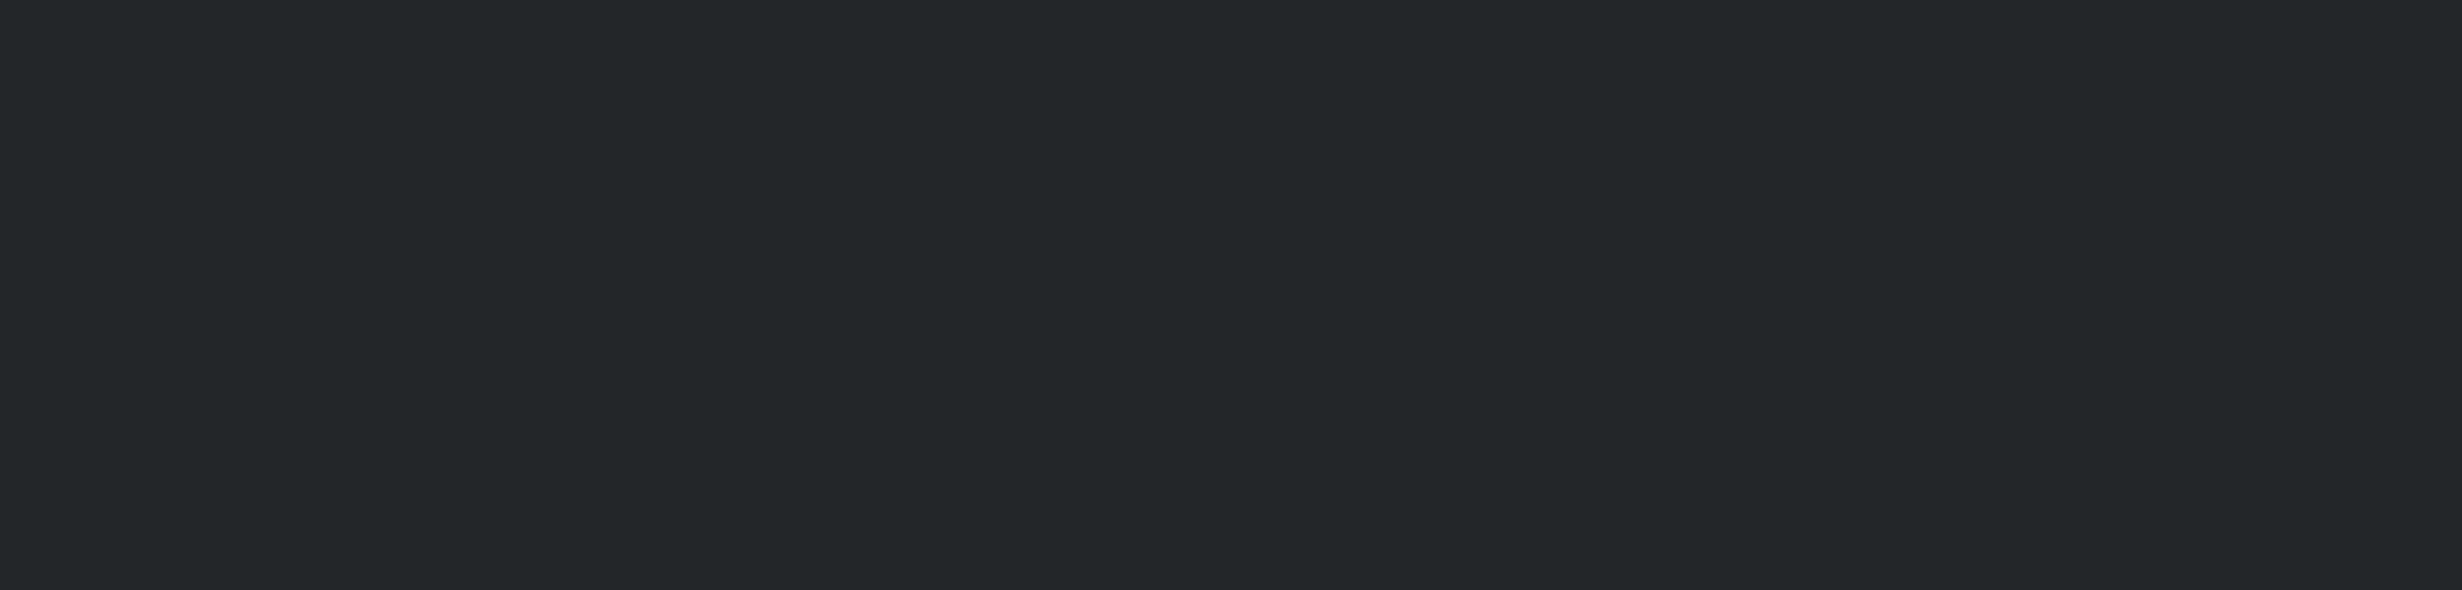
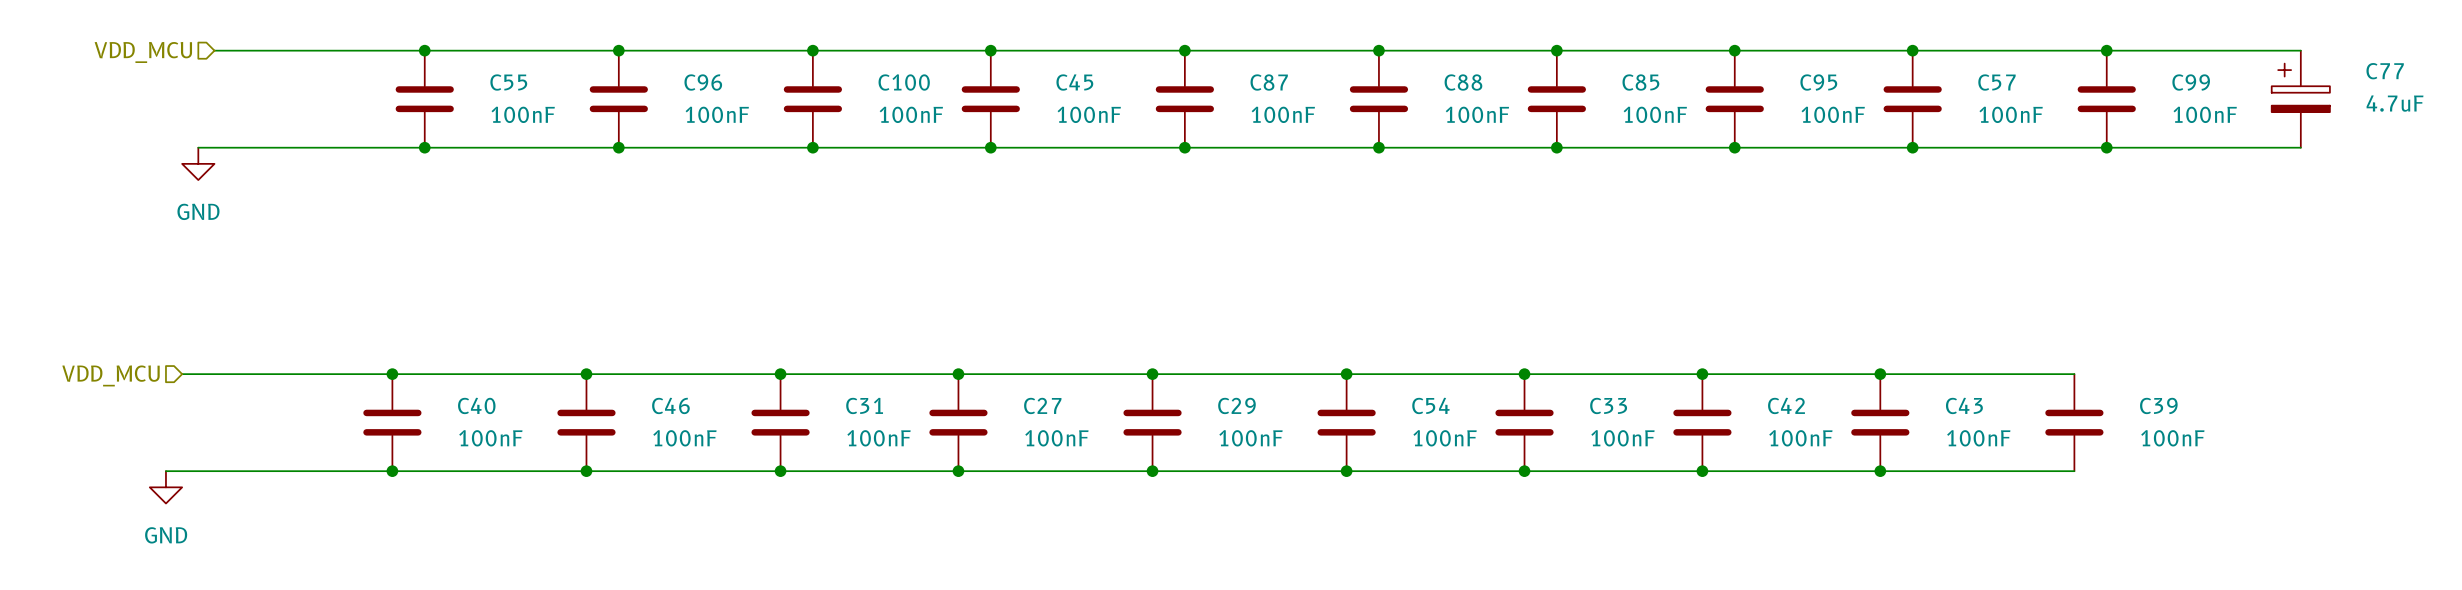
wire: none -> (214, 50) (2300, 50)
junction: none -> (424, 50)
junction: none -> (618, 50)
junction: none -> (812, 50)
junction: none -> (990, 50)
junction: none -> (1184, 50)
junction: none -> (1378, 50)
junction: none -> (1556, 50)
junction: none -> (1734, 50)
junction: none -> (1912, 50)
junction: none -> (2106, 50)
hierarchical label: none -> VDD_MCU (143, 52)
C55: none -> 100nF (424, 99)
C96: none -> 100nF (618, 99)
C100: none -> 100nF (812, 99)
C45: none -> 100nF (990, 99)
C87: none -> 100nF (1184, 99)
C88: none -> 100nF (1378, 99)
C85: none -> 100nF (1556, 99)
C95: none -> 100nF (1734, 99)
C57: none -> 100nF (1912, 99)
C99: none -> 100nF (2106, 99)
C77: none -> 4.7uF (2300, 99)
wire: none -> (198, 147) (2300, 147)
junction: none -> (424, 147)
junction: none -> (618, 147)
junction: none -> (812, 147)
junction: none -> (990, 147)
junction: none -> (1184, 147)
junction: none -> (1378, 147)
junction: none -> (1556, 147)
junction: none -> (1734, 147)
junction: none -> (1912, 147)
junction: none -> (2106, 147)
power symbol: none -> GND (198, 163)
wire: none -> (182, 374) (2074, 374)
junction: none -> (392, 374)
junction: none -> (586, 374)
junction: none -> (780, 374)
junction: none -> (958, 374)
junction: none -> (1152, 374)
junction: none -> (1346, 374)
junction: none -> (1524, 374)
junction: none -> (1702, 374)
junction: none -> (1880, 374)
hierarchical label: none -> VDD_MCU (110, 375)
C40: none -> 100nF (392, 422)
C46: none -> 100nF (586, 422)
C31: none -> 100nF (780, 422)
C27: none -> 100nF (958, 422)
C29: none -> 100nF (1152, 422)
C54: none -> 100nF (1346, 422)
C33: none -> 100nF (1524, 422)
C42: none -> 100nF (1702, 422)
C43: none -> 100nF (1880, 422)
C39: none -> 100nF (2074, 422)
wire: none -> (165, 471) (2074, 471)
junction: none -> (392, 471)
junction: none -> (586, 471)
junction: none -> (780, 471)
junction: none -> (958, 471)
junction: none -> (1152, 471)
junction: none -> (1346, 471)
junction: none -> (1524, 471)
junction: none -> (1702, 471)
junction: none -> (1880, 471)
power symbol: none -> GND (165, 487)

